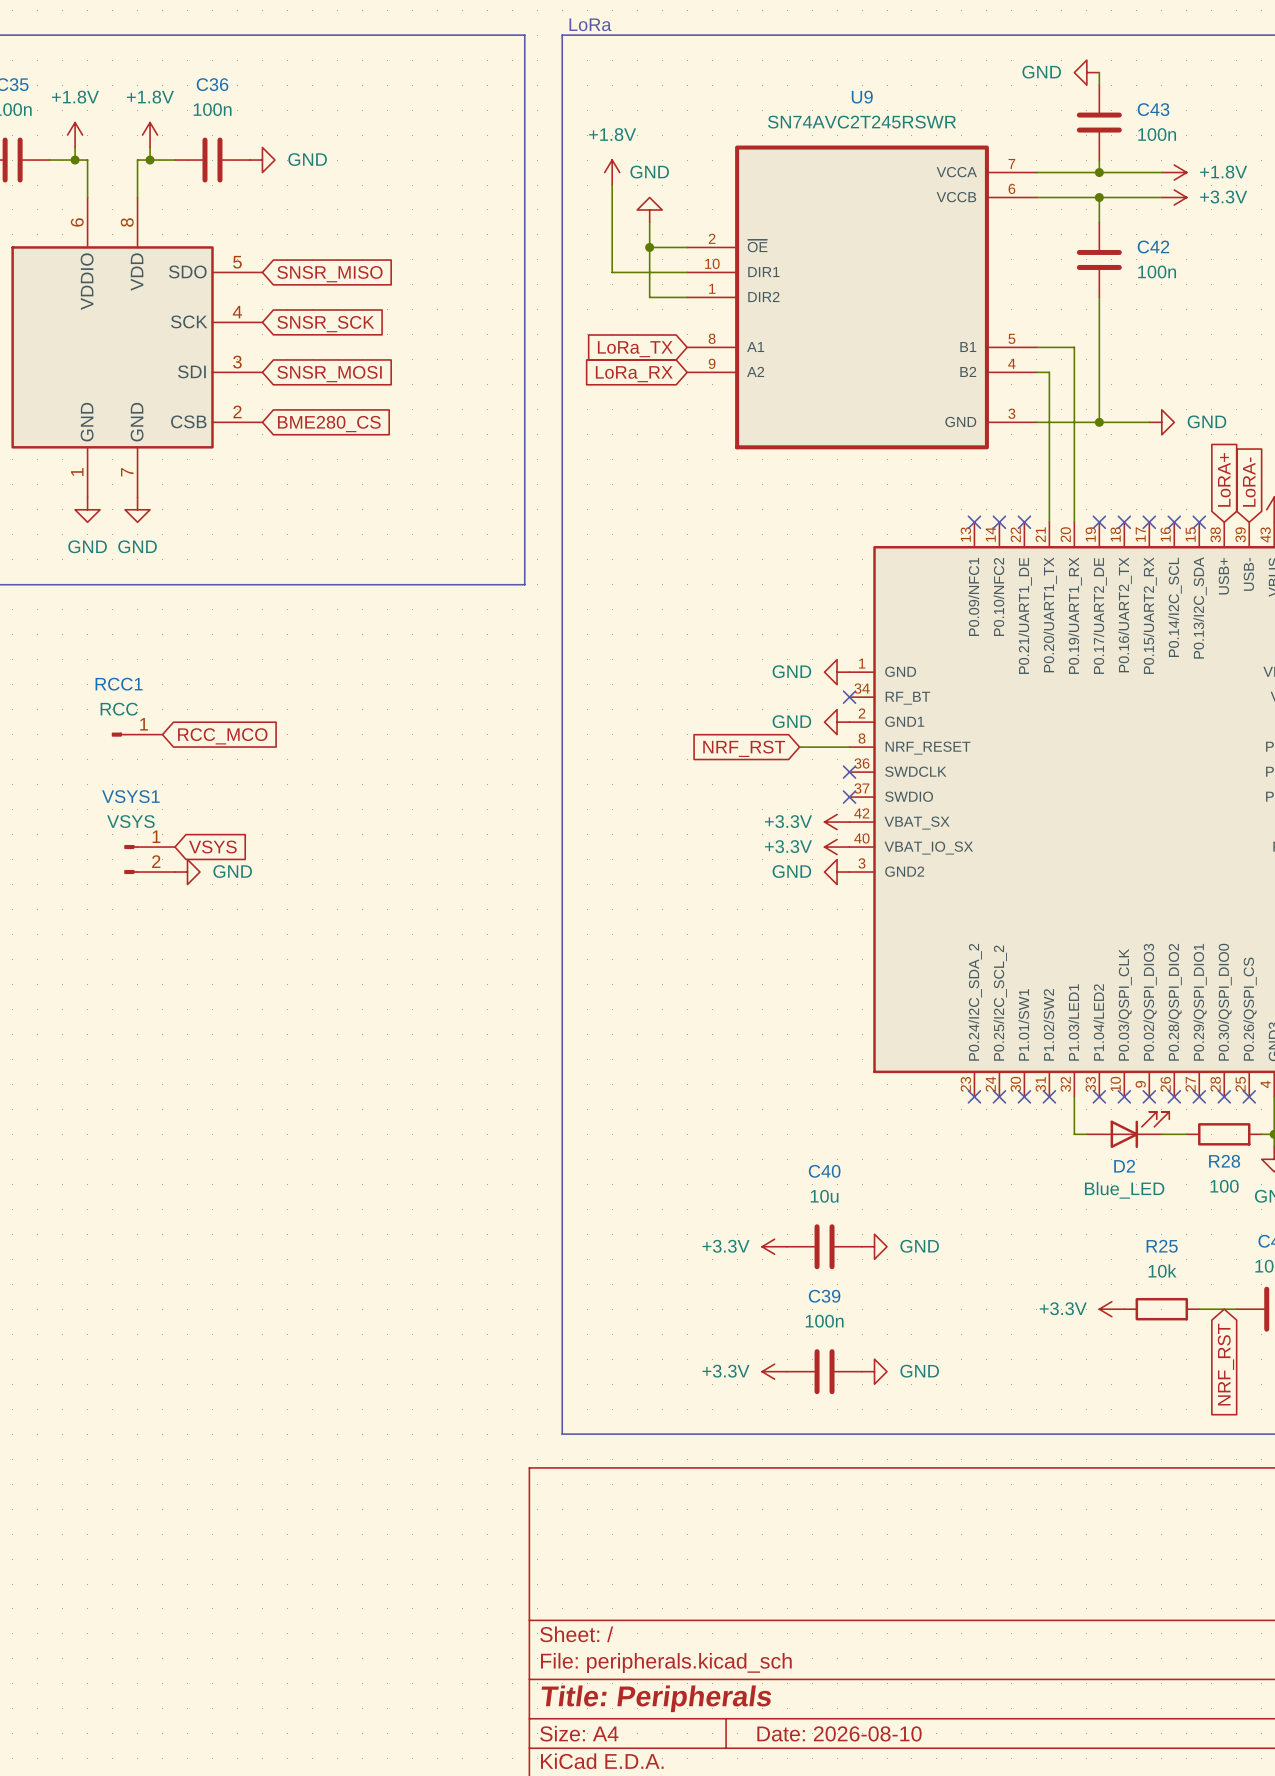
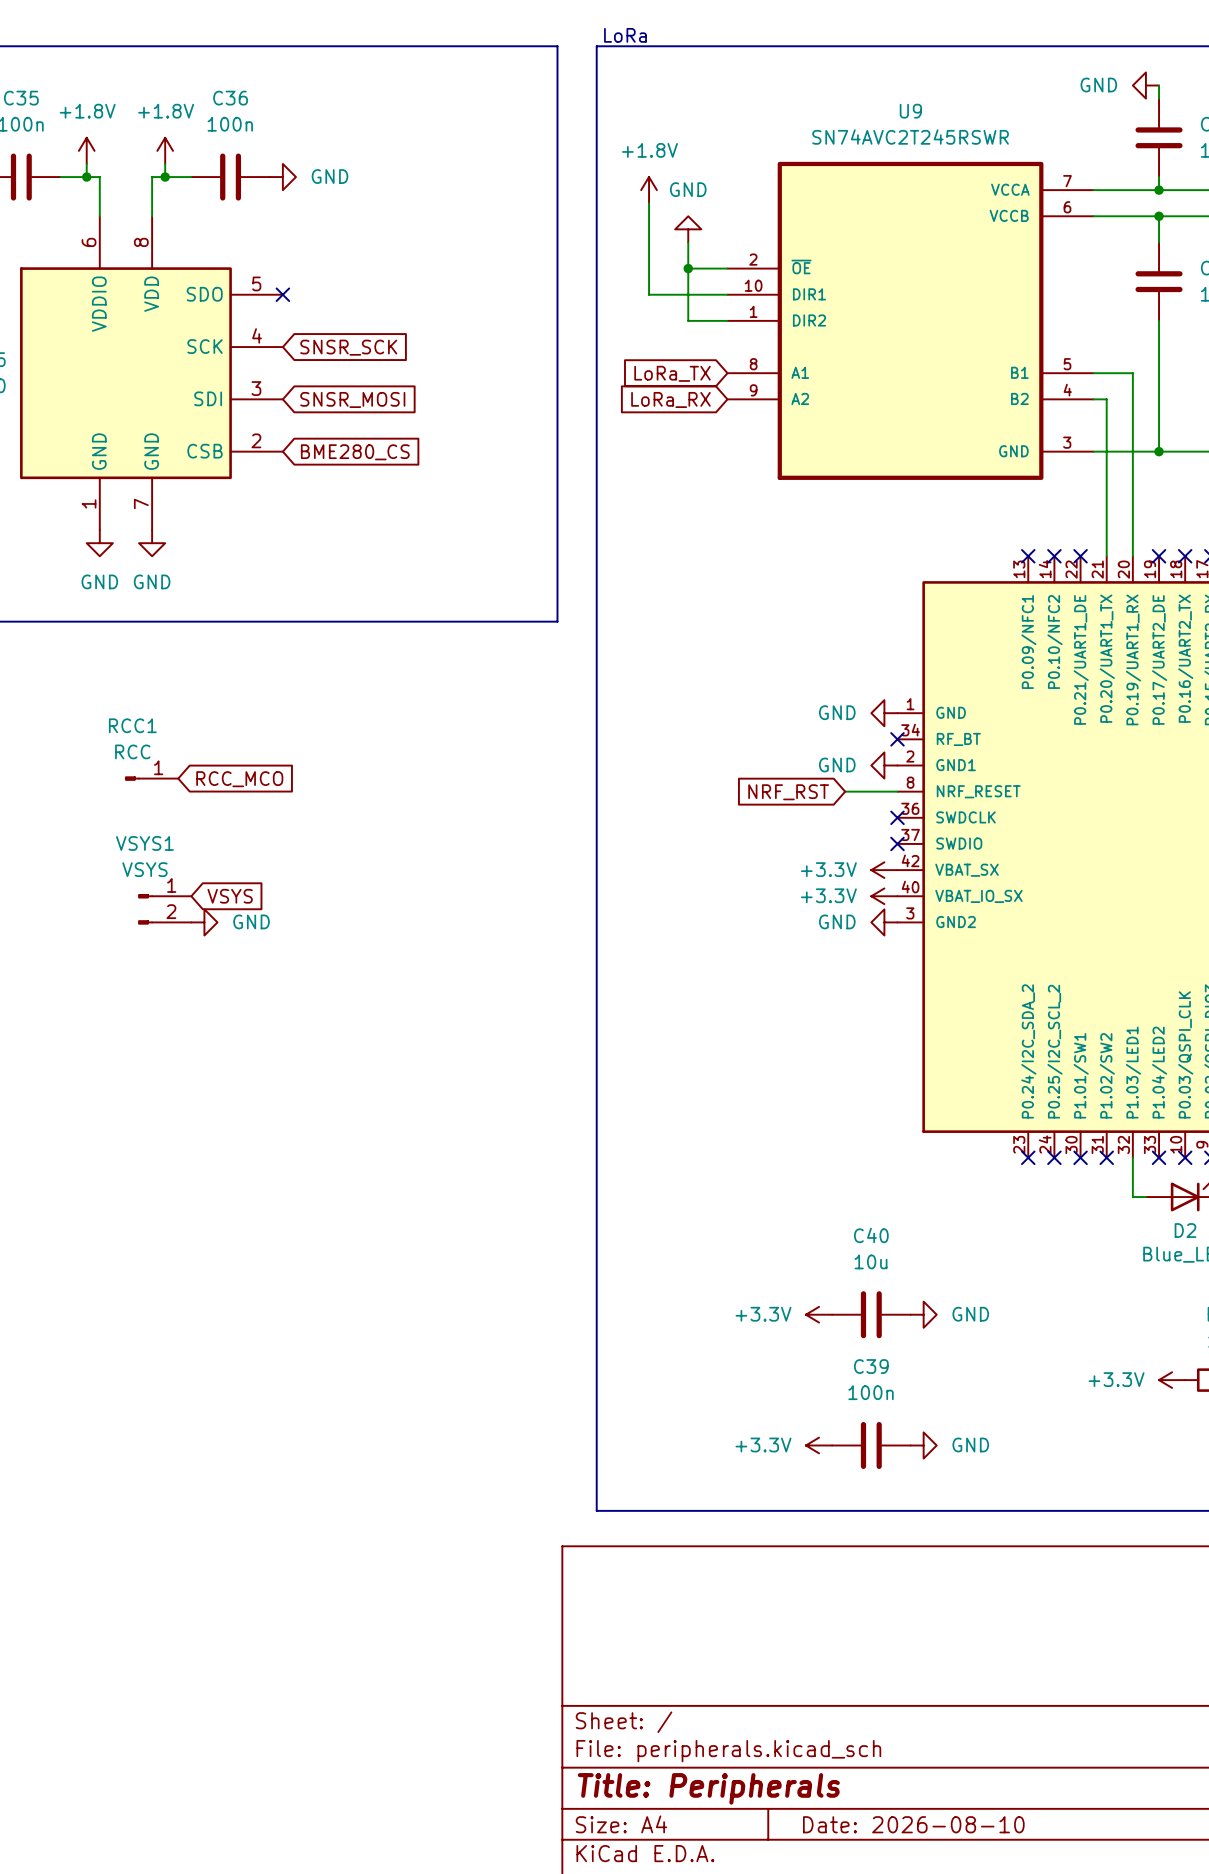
no-connect mark: none -> (282, 294)
global label: SNSR_MISO (329, 274) -> none

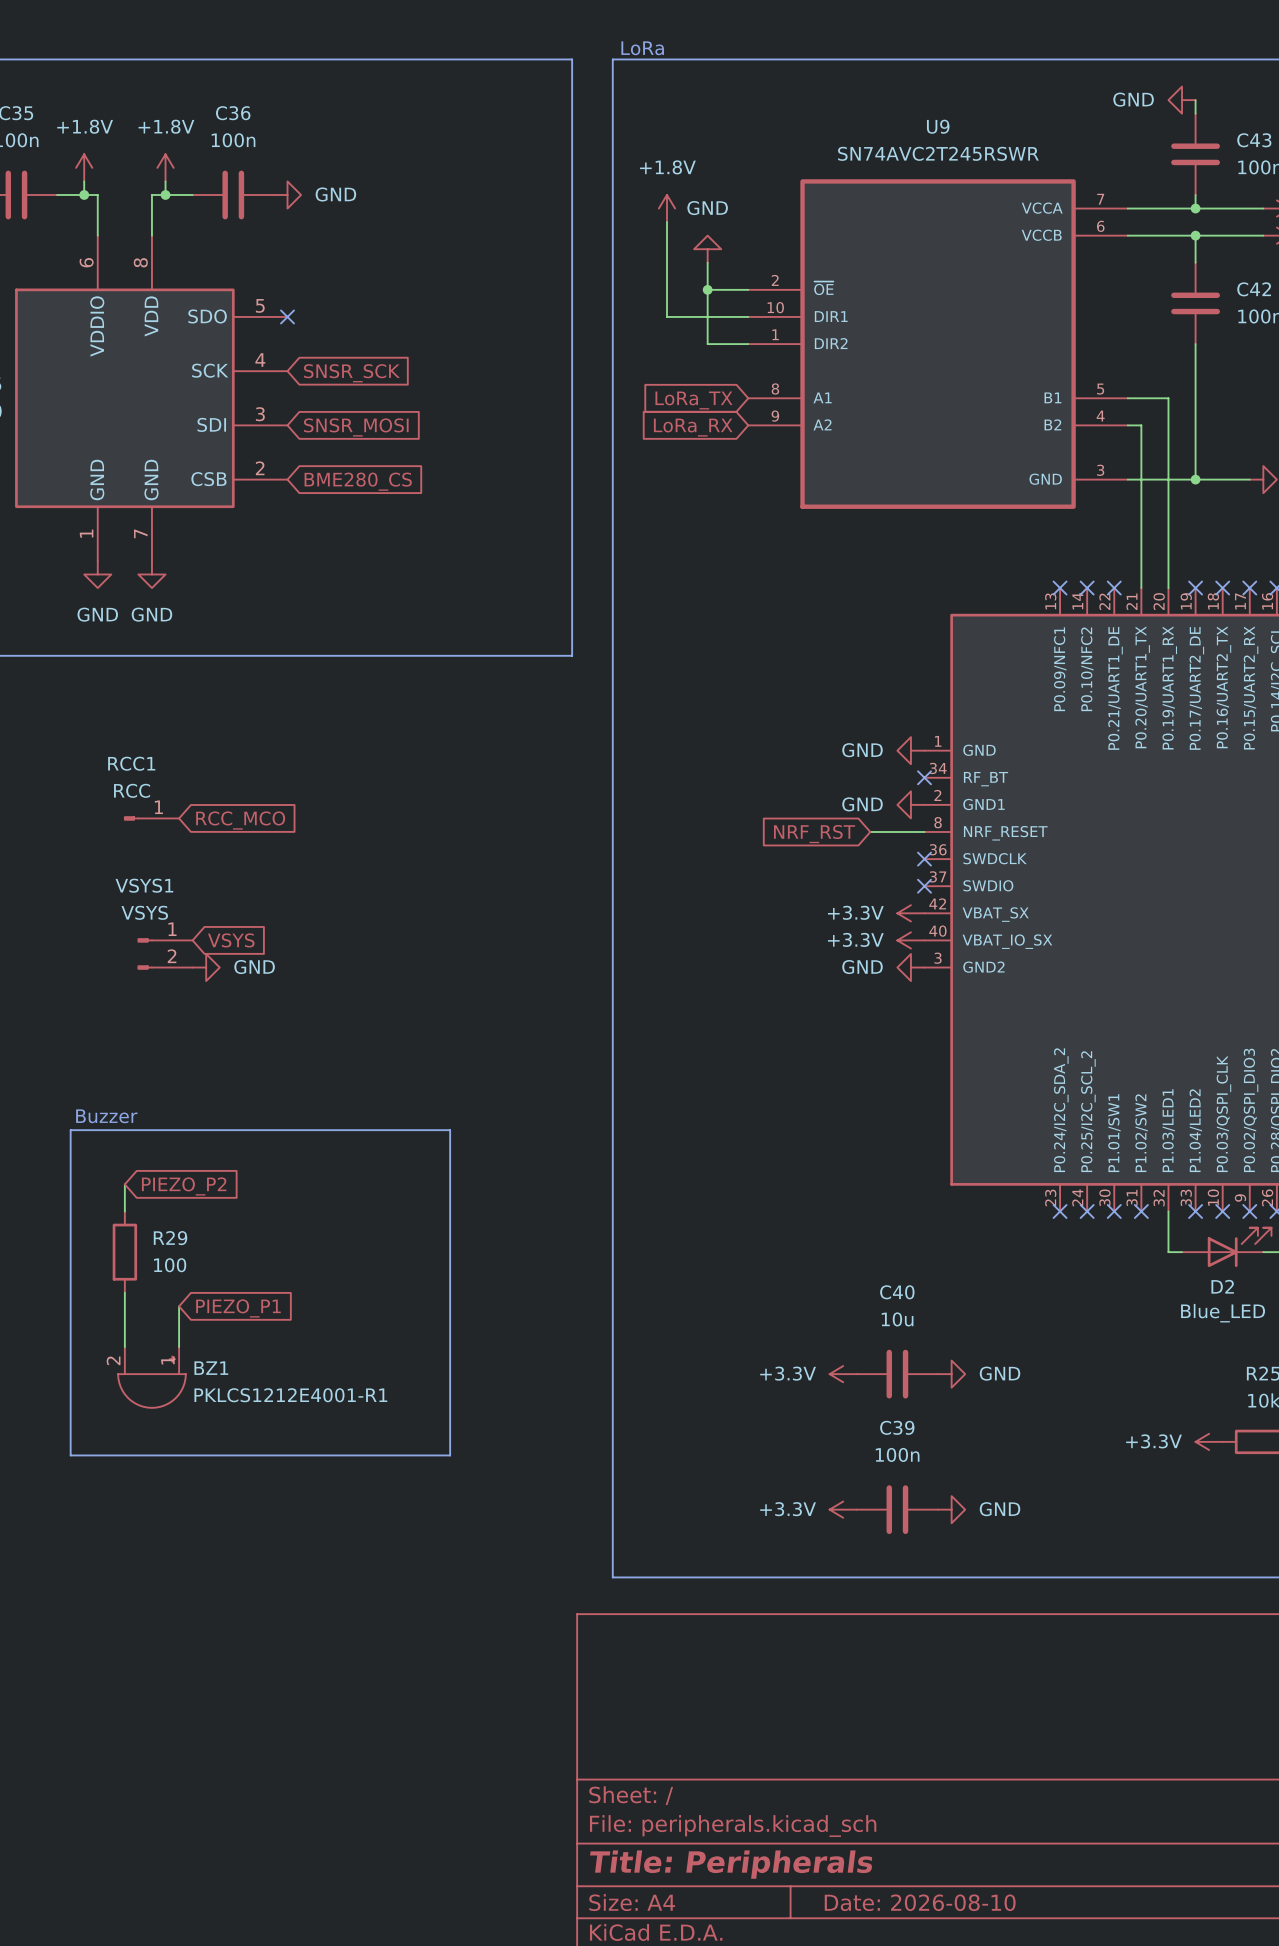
text: none -> Buzzer (106, 1116)
line: none -> (70, 1130) (450, 1130) (450, 1455) (70, 1455) (70, 1130)
wire: none -> (124, 1184) (124, 1211)
global label: none -> PIEZO_P2 (184, 1186)
R29: none -> 100 (124, 1252)
wire: none -> (124, 1292) (124, 1347)
wire: none -> (179, 1306) (179, 1347)
global label: none -> PIEZO_P1 (238, 1308)
BZ1: none -> PKLCS1212E4001-R1 (151, 1377)

